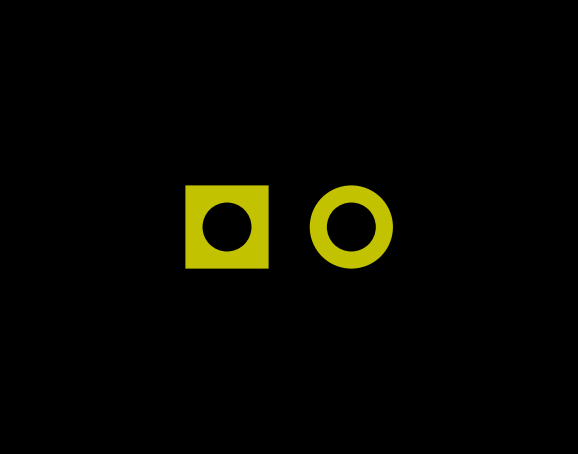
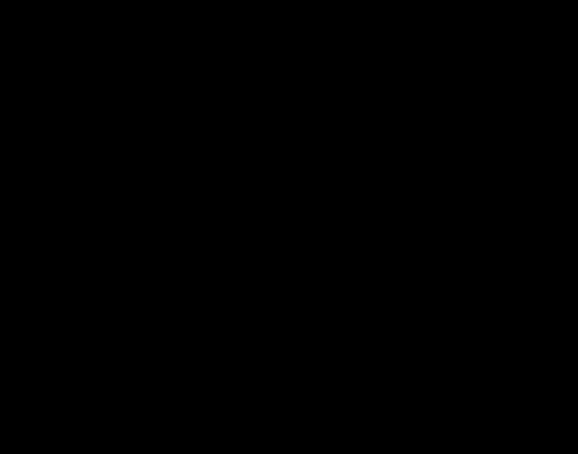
part: (289, 227) -> none

